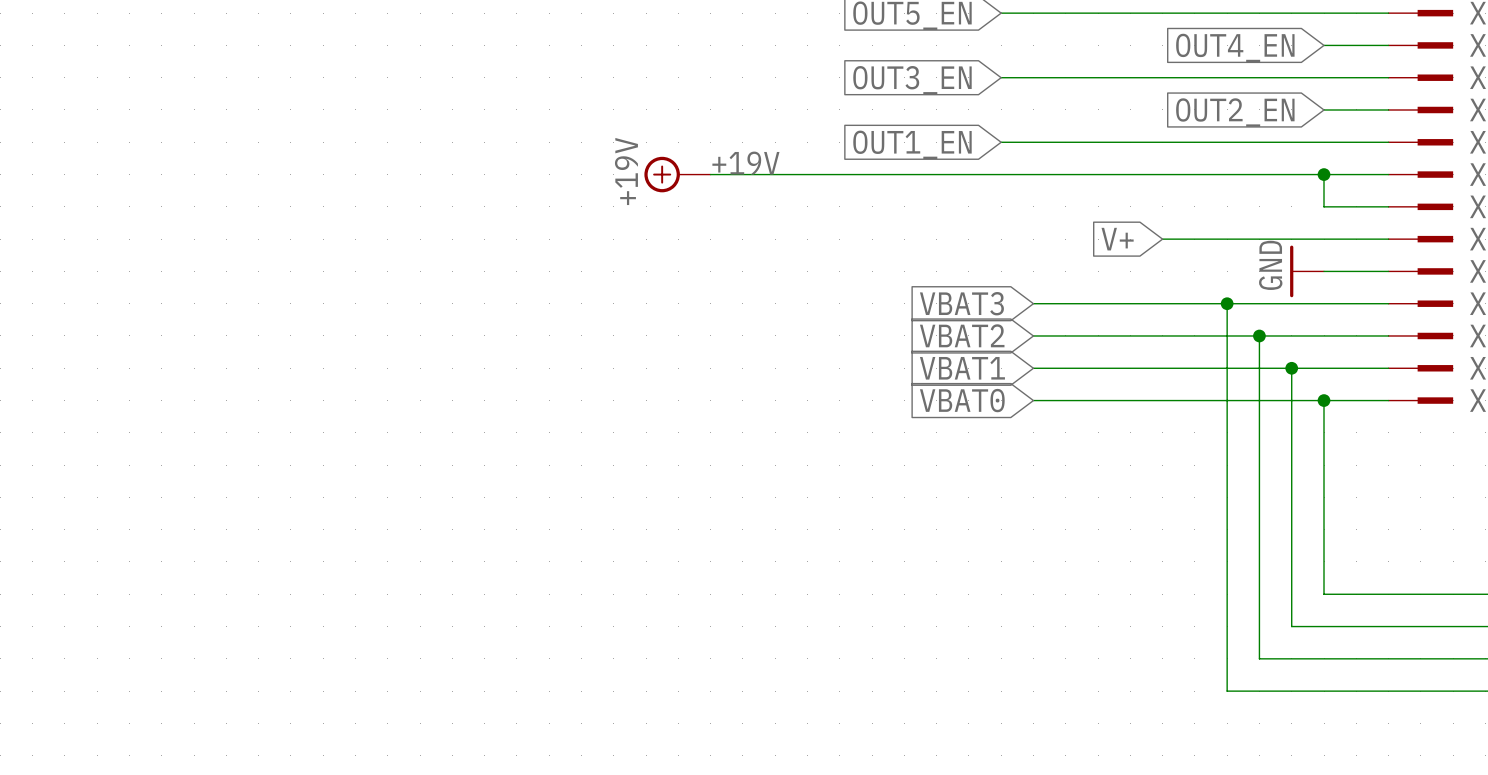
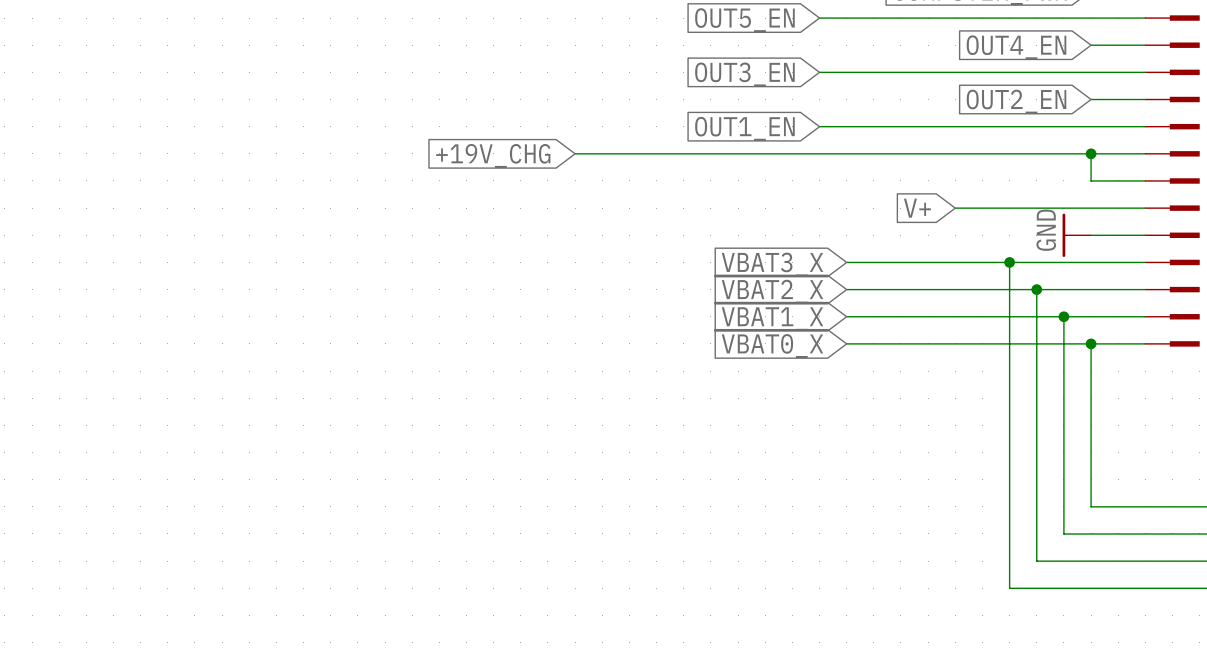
label: +19V (745, 163) -> none
power symbol: +19V (677, 174) -> none
global label: none -> +19V_CHG (493, 155)
global label: VBAT3 (961, 303) -> VBAT3_X (772, 264)
global label: VBAT2 (962, 335) -> VBAT2_X (772, 291)
global label: VBAT1 (962, 368) -> VBAT1_X (772, 319)
global label: VBAT0 (962, 400) -> VBAT0_X (772, 346)

